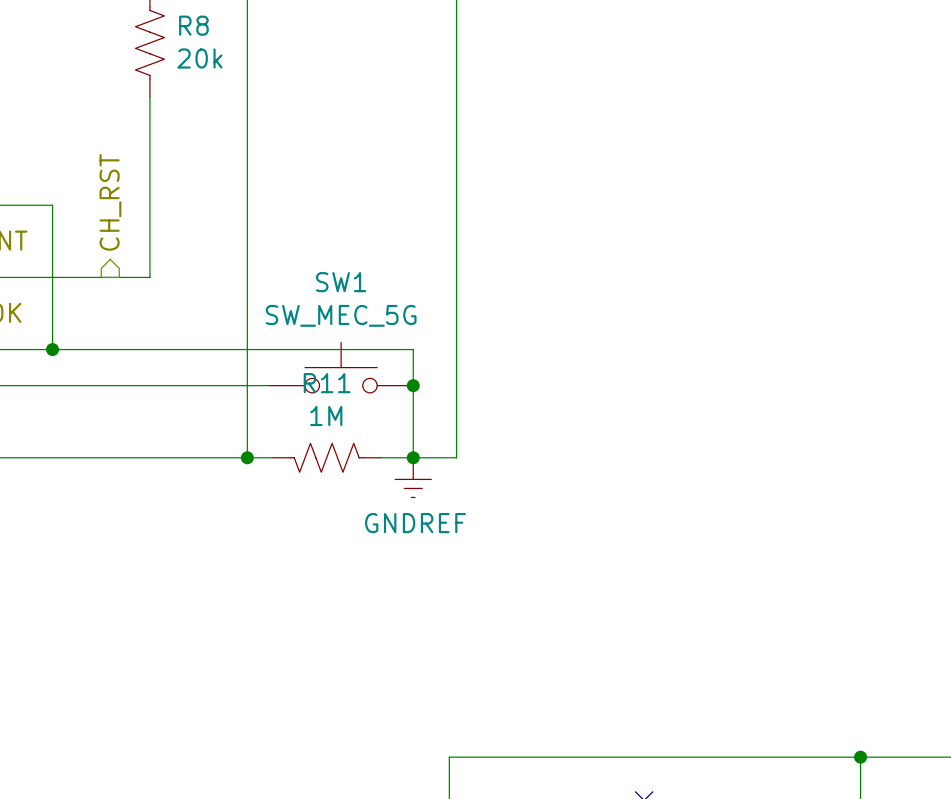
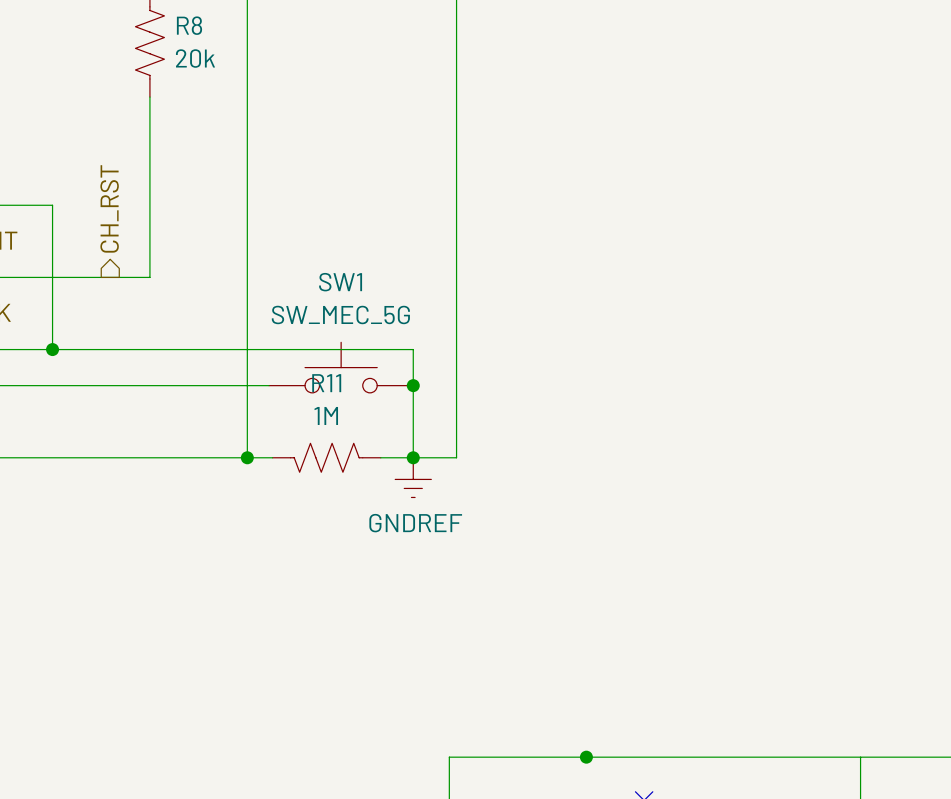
junction: none -> (586, 757)
junction: (860, 757) -> none

